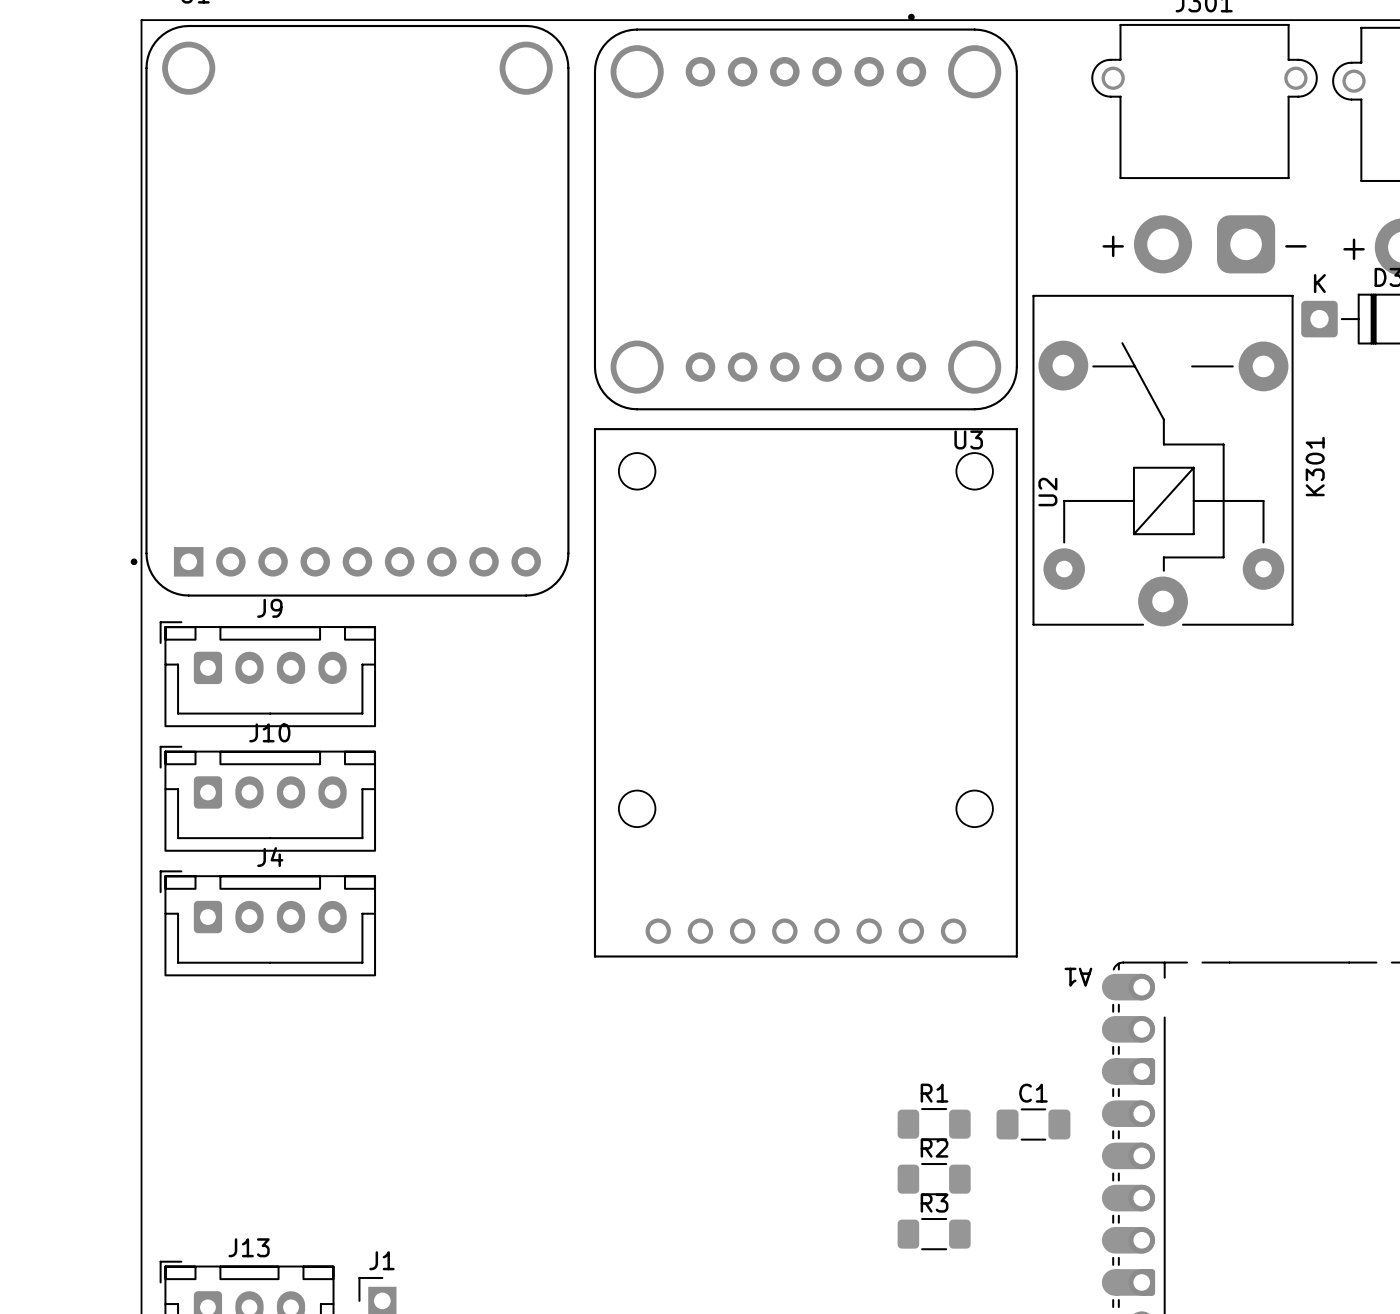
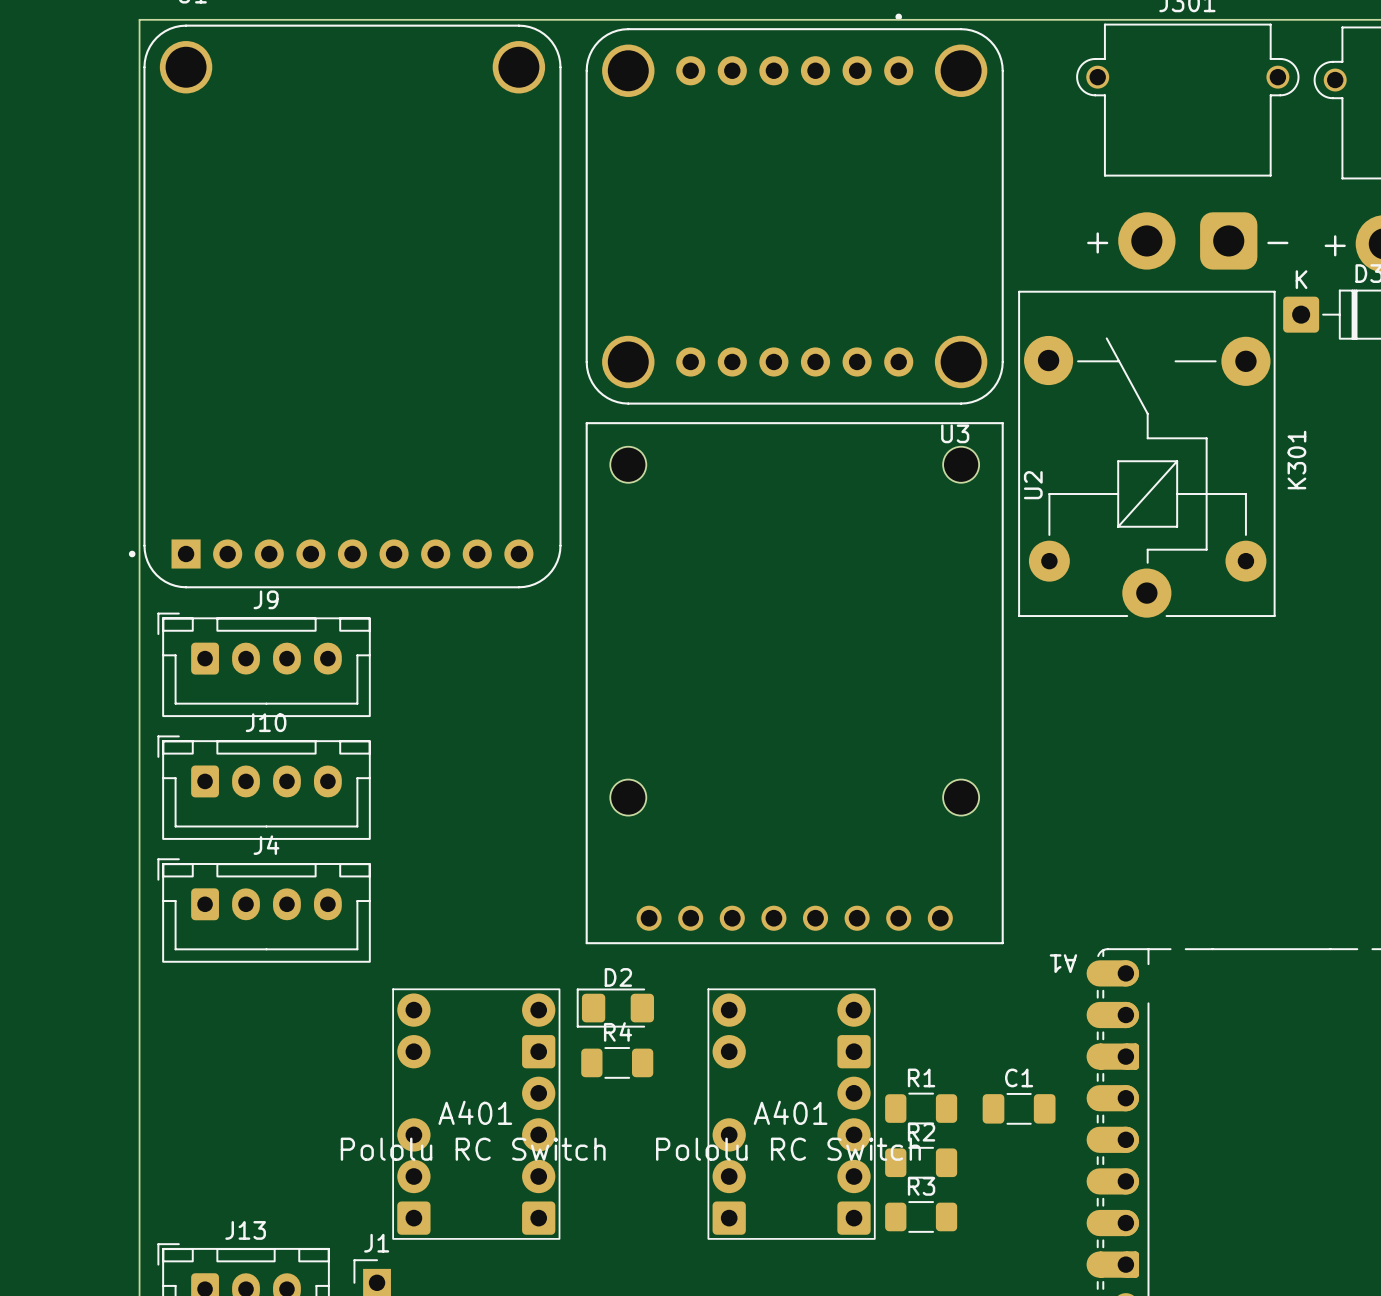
D2: none -> (615, 1008)
R4: none -> (617, 1062)
part: none -> (476, 1114)
part: none -> (791, 1114)

